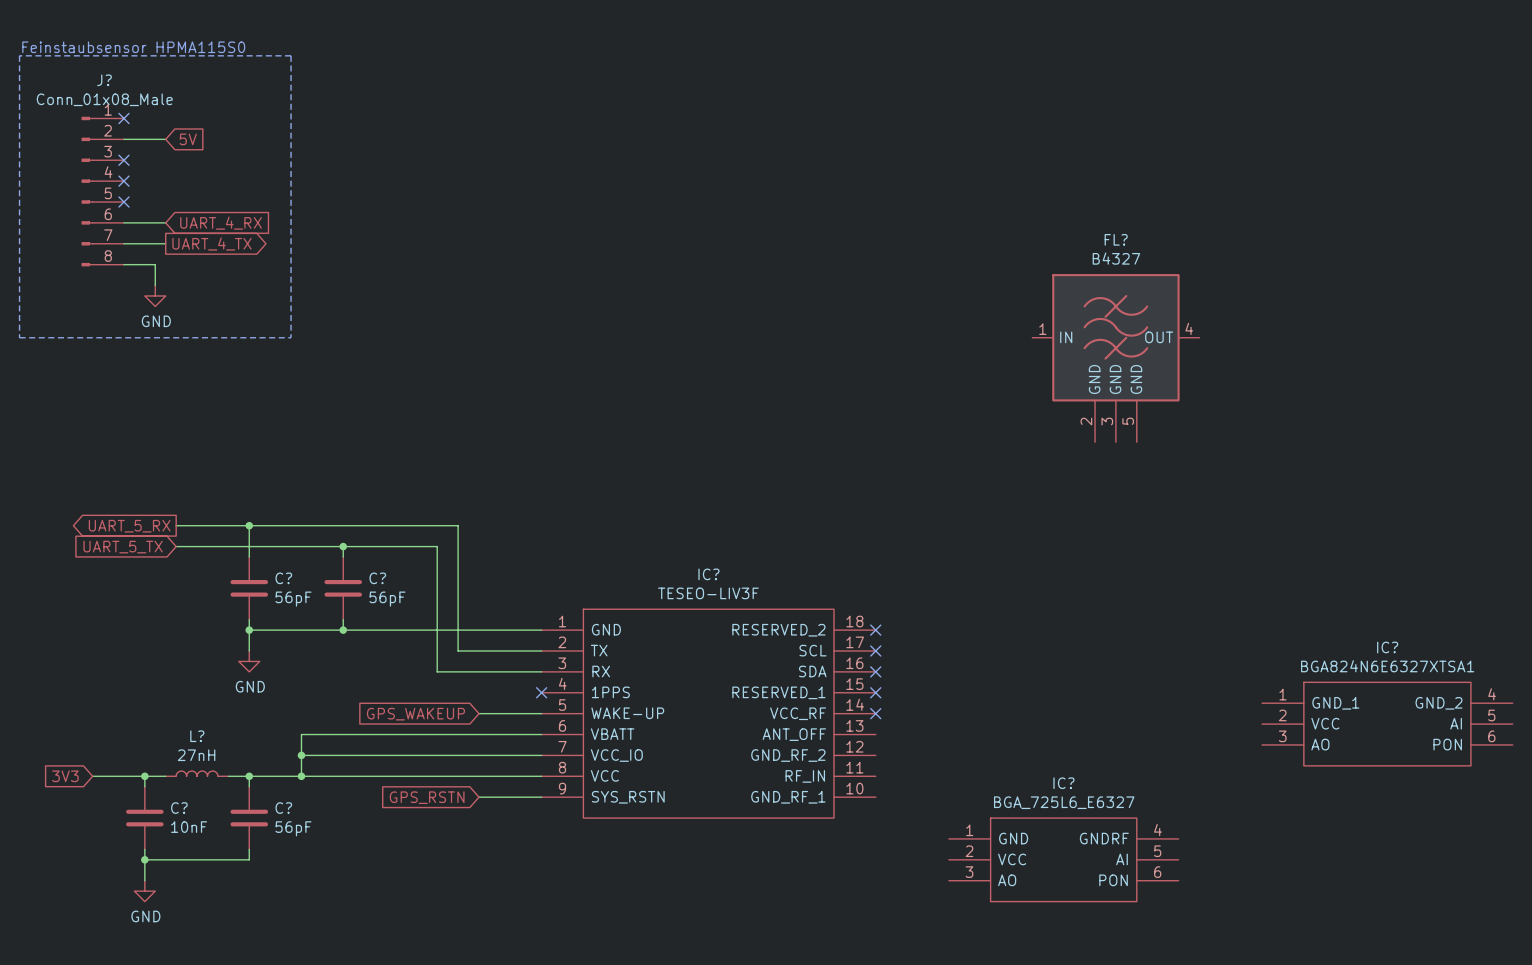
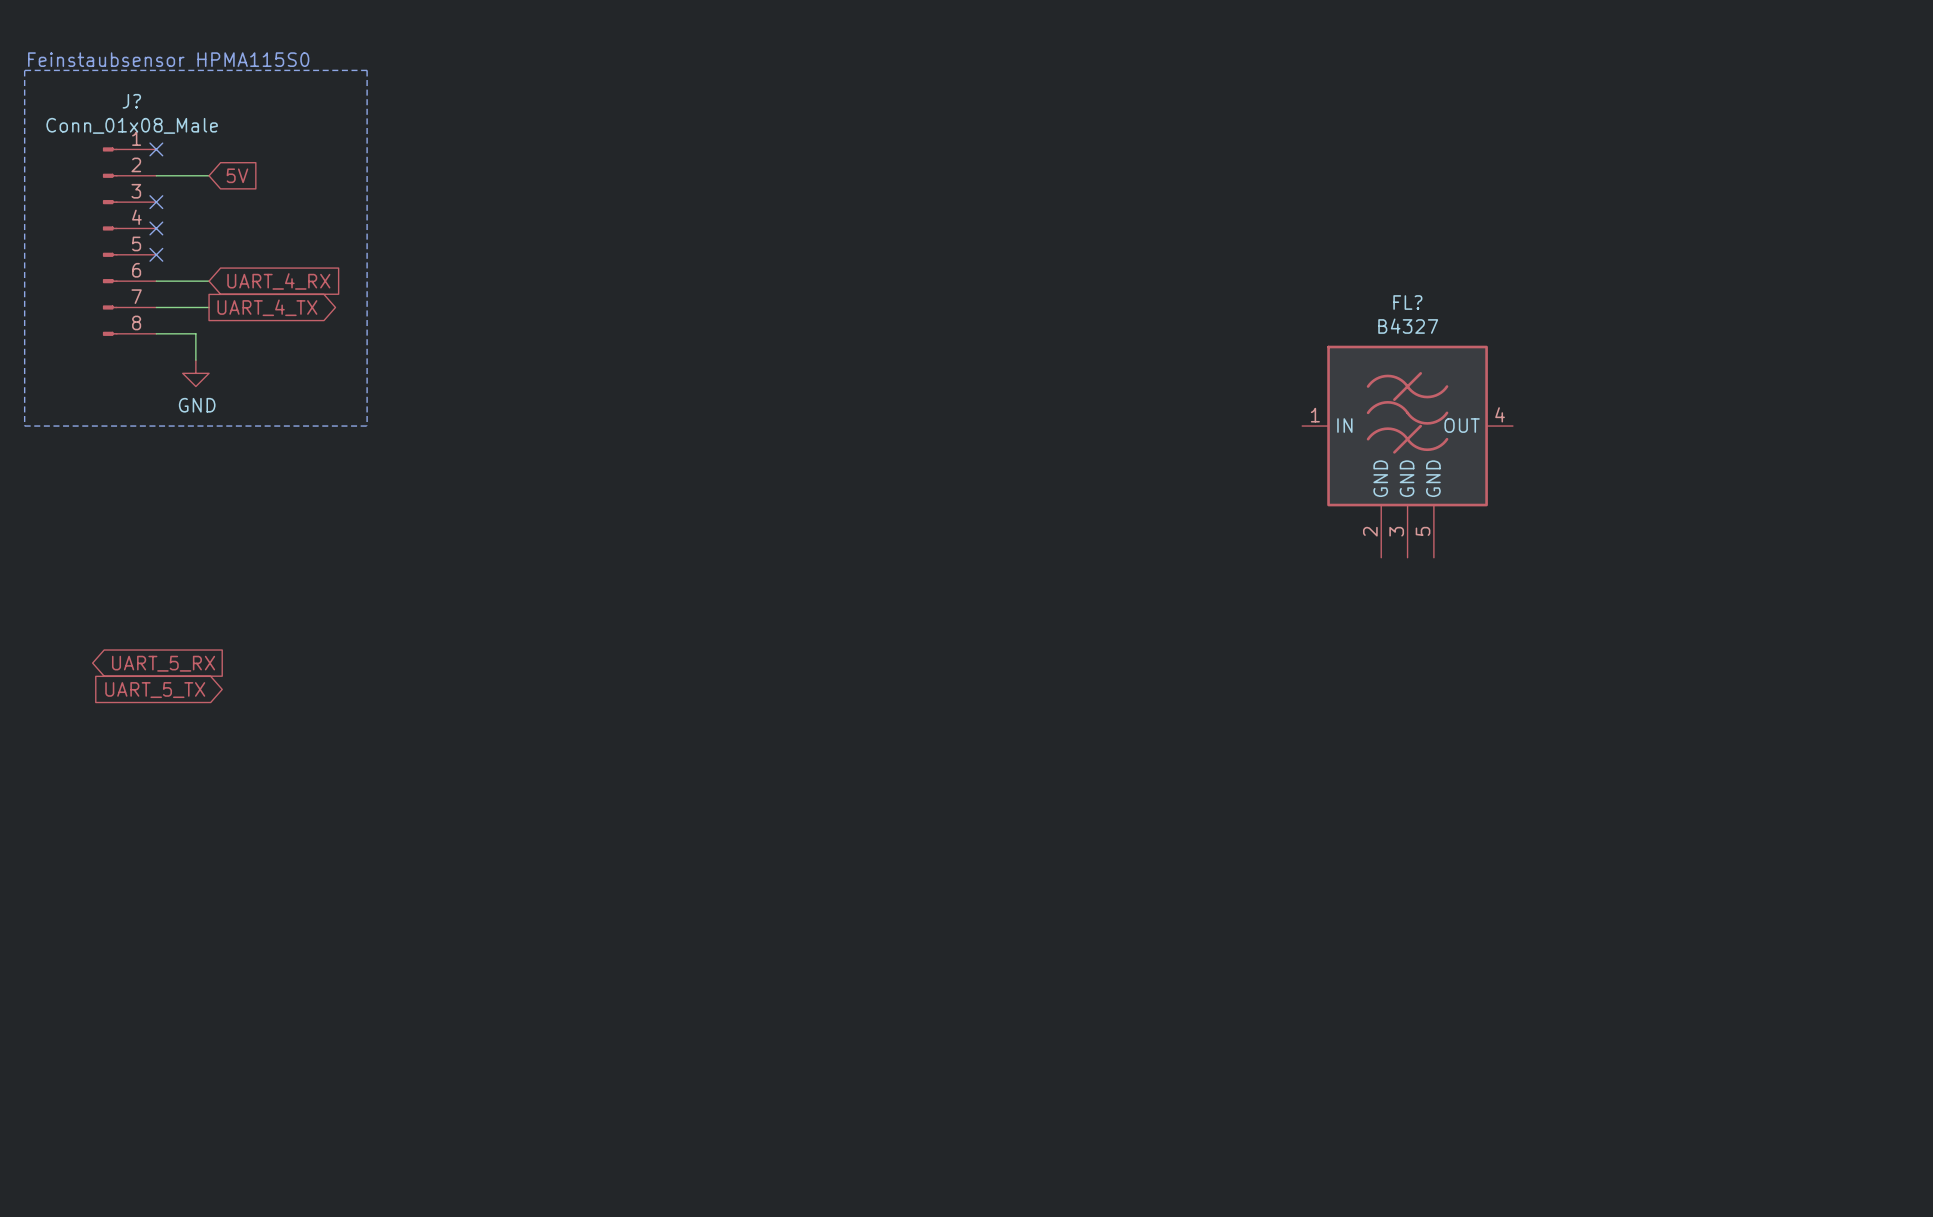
wire: (176, 525) (458, 525) (458, 651) (541, 651) -> none
wire: (249, 525) (249, 557) -> none
junction: (249, 525) -> none
wire: (176, 546) (437, 546) (437, 671) (541, 671) -> none
wire: (343, 546) (343, 557) -> none
junction: (343, 546) -> none
C?: 56pF (249, 588) -> none
C?: 56pF (343, 588) -> none
wire: (249, 619) (249, 651) -> none
wire: (343, 619) (343, 630) -> none
wire: (249, 630) (541, 630) -> none
junction: (249, 630) -> none
junction: (343, 630) -> none
no-connect mark: (875, 630) -> none
no-connect mark: (875, 651) -> none
power symbol: GND (249, 661) -> none
no-connect mark: (875, 671) -> none
no-connect mark: (541, 692) -> none
no-connect mark: (875, 692) -> none
wire: (478, 713) (541, 713) -> none
IC?: TESEO-LIV3F (708, 713) -> none
no-connect mark: (875, 713) -> none
global label: GPS_WAKEUP (415, 714) -> none
IC?: BGA824N6E6327XTSA1 (1387, 724) -> none
wire: (541, 734) (301, 734) (301, 776) -> none
wire: (301, 755) (541, 755) -> none
junction: (301, 755) -> none
L?: 27nH (197, 773) -> none
global label: 3V3 (65, 776) -> none
wire: (92, 776) (165, 776) -> none
wire: (144, 776) (144, 786) -> none
junction: (144, 776) -> none
wire: (228, 776) (541, 776) -> none
wire: (249, 776) (249, 786) -> none
junction: (249, 776) -> none
junction: (301, 776) -> none
global label: GPS_RSTN (427, 797) -> none
wire: (478, 797) (541, 797) -> none
C?: 10nF (144, 818) -> none
C?: 56pF (249, 818) -> none
wire: (144, 849) (144, 880) -> none
wire: (249, 849) (249, 859) (144, 859) -> none
junction: (144, 859) -> none
IC?: BGA_725L6_E6327 (1063, 859) -> none
power symbol: GND (144, 891) -> none

